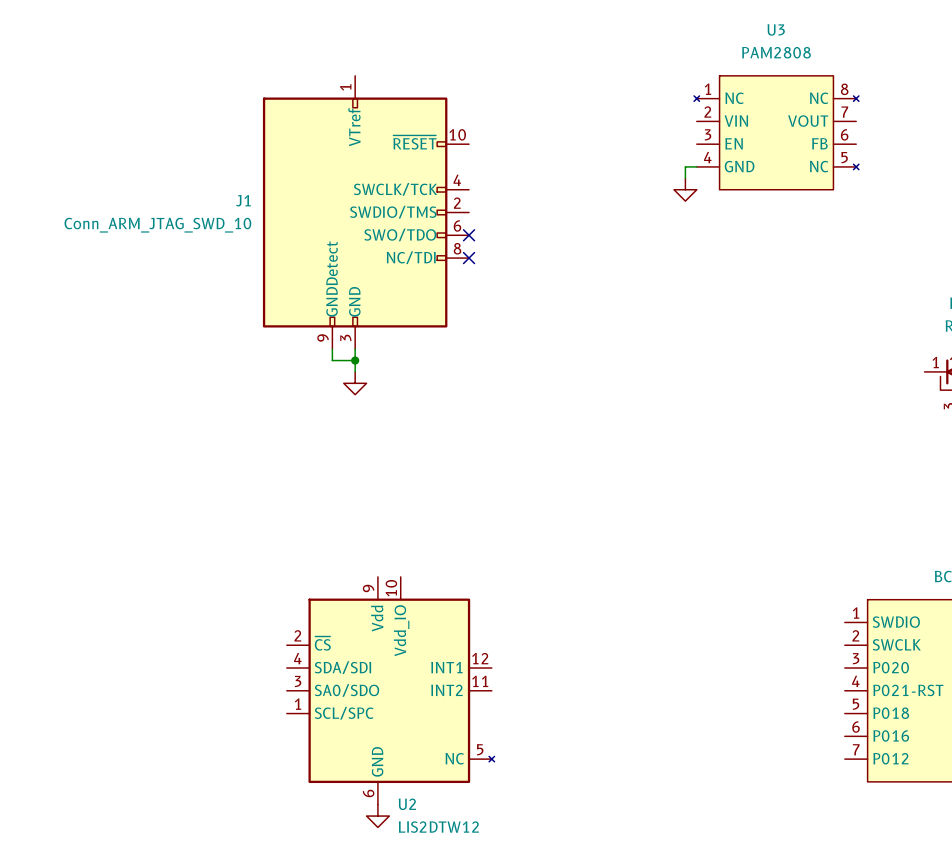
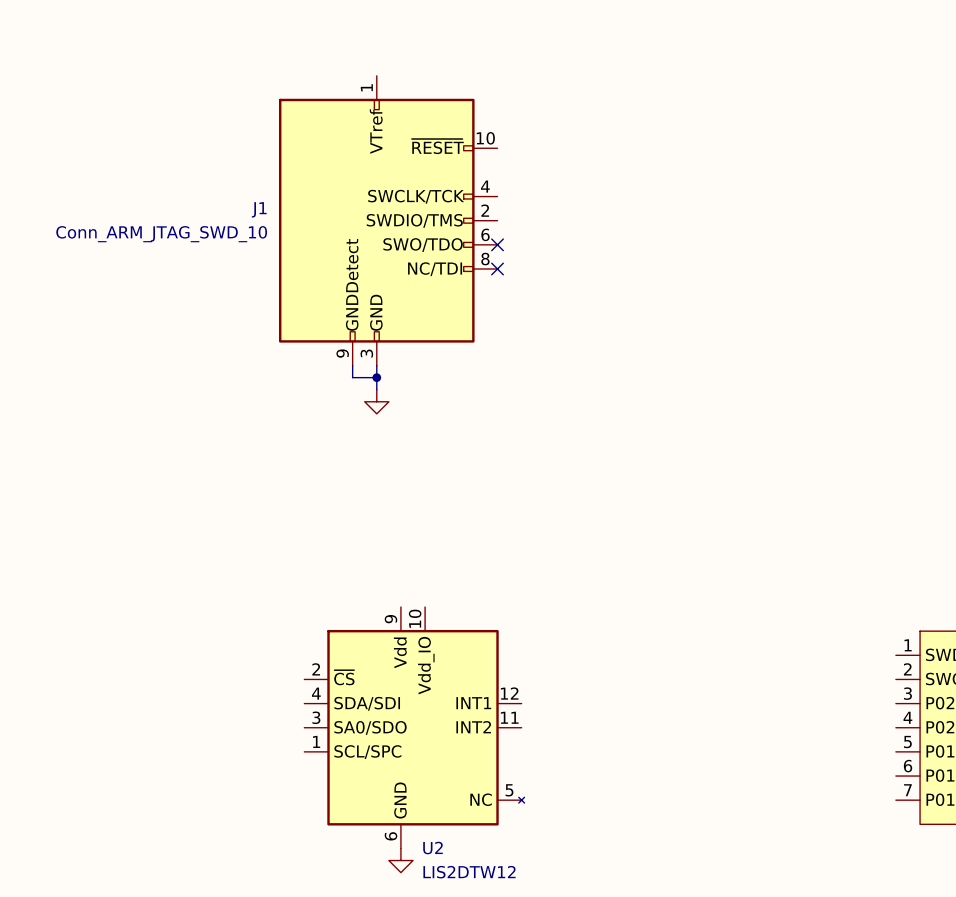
U3: PAM2808 (776, 132) -> none
wire: (696, 166) (685, 166) (685, 178) -> none
power symbol: (685, 189) -> none

